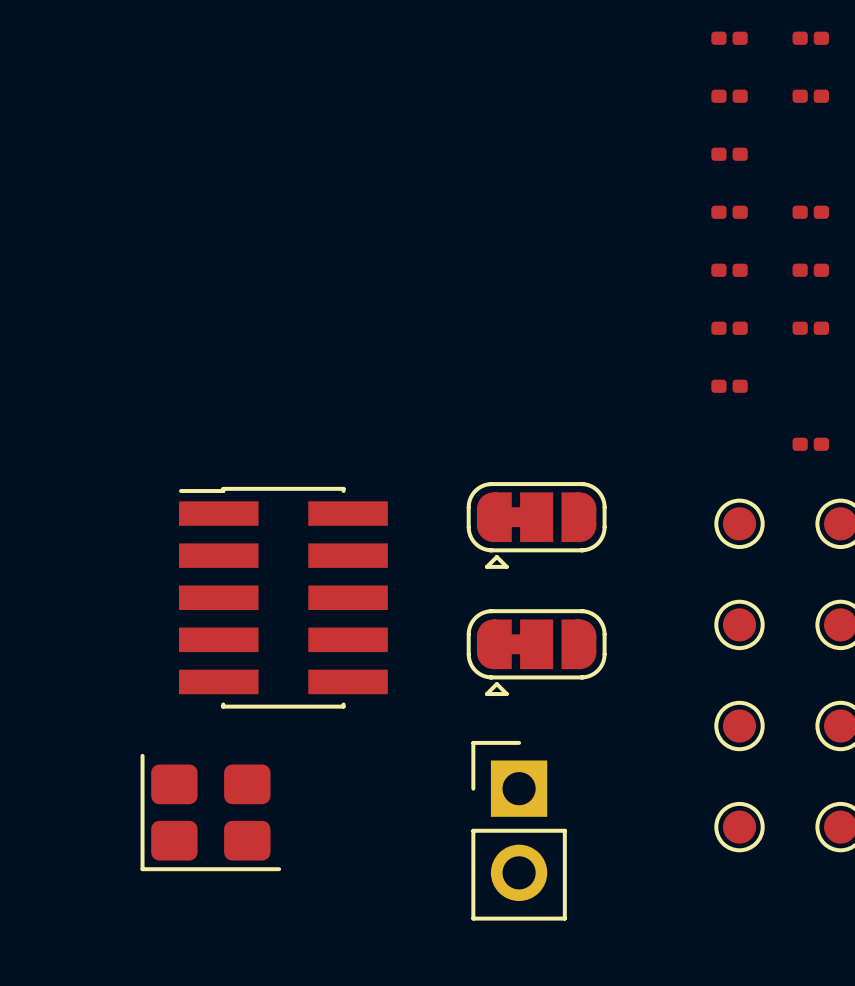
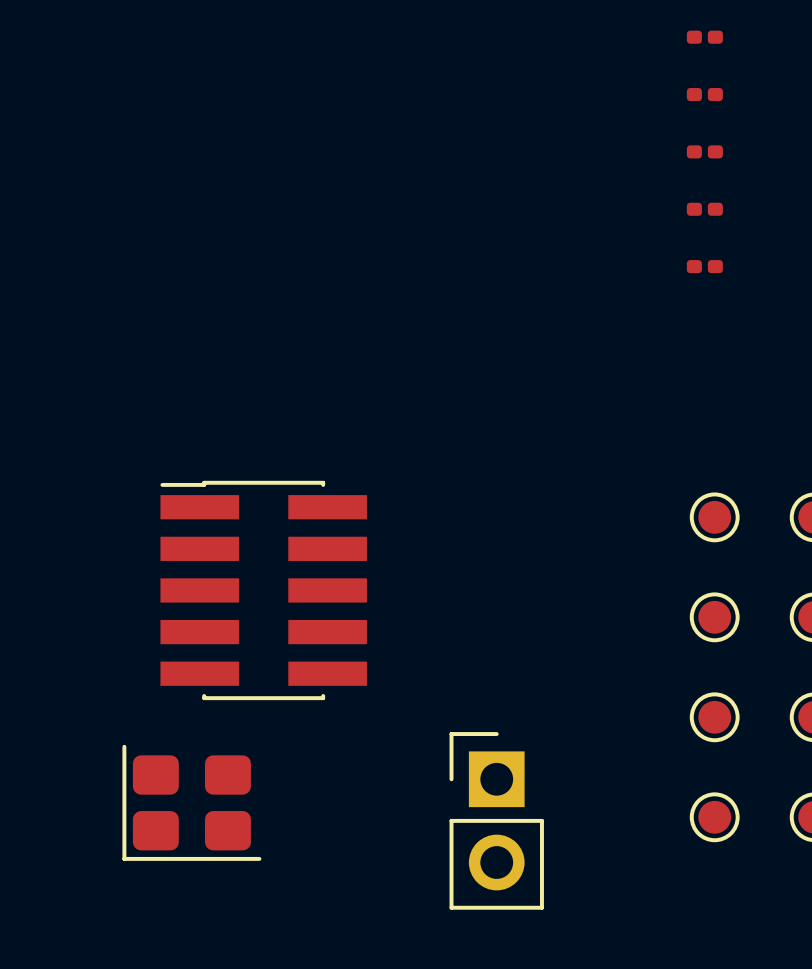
part: (810, 38) -> none
part: (810, 96) -> none
part: (810, 212) -> none
part: (810, 270) -> none
part: (729, 328) -> none
part: (810, 328) -> none
part: (729, 386) -> none
part: (810, 444) -> none
part: (536, 525) -> none
part: (536, 652) -> none

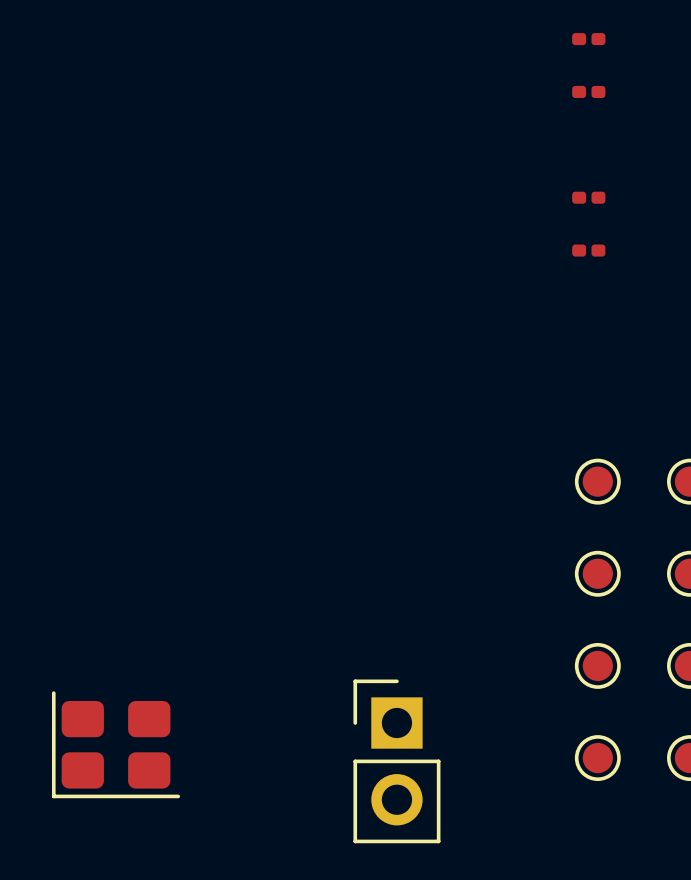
part: (704, 151) -> none
part: (263, 590) -> none

